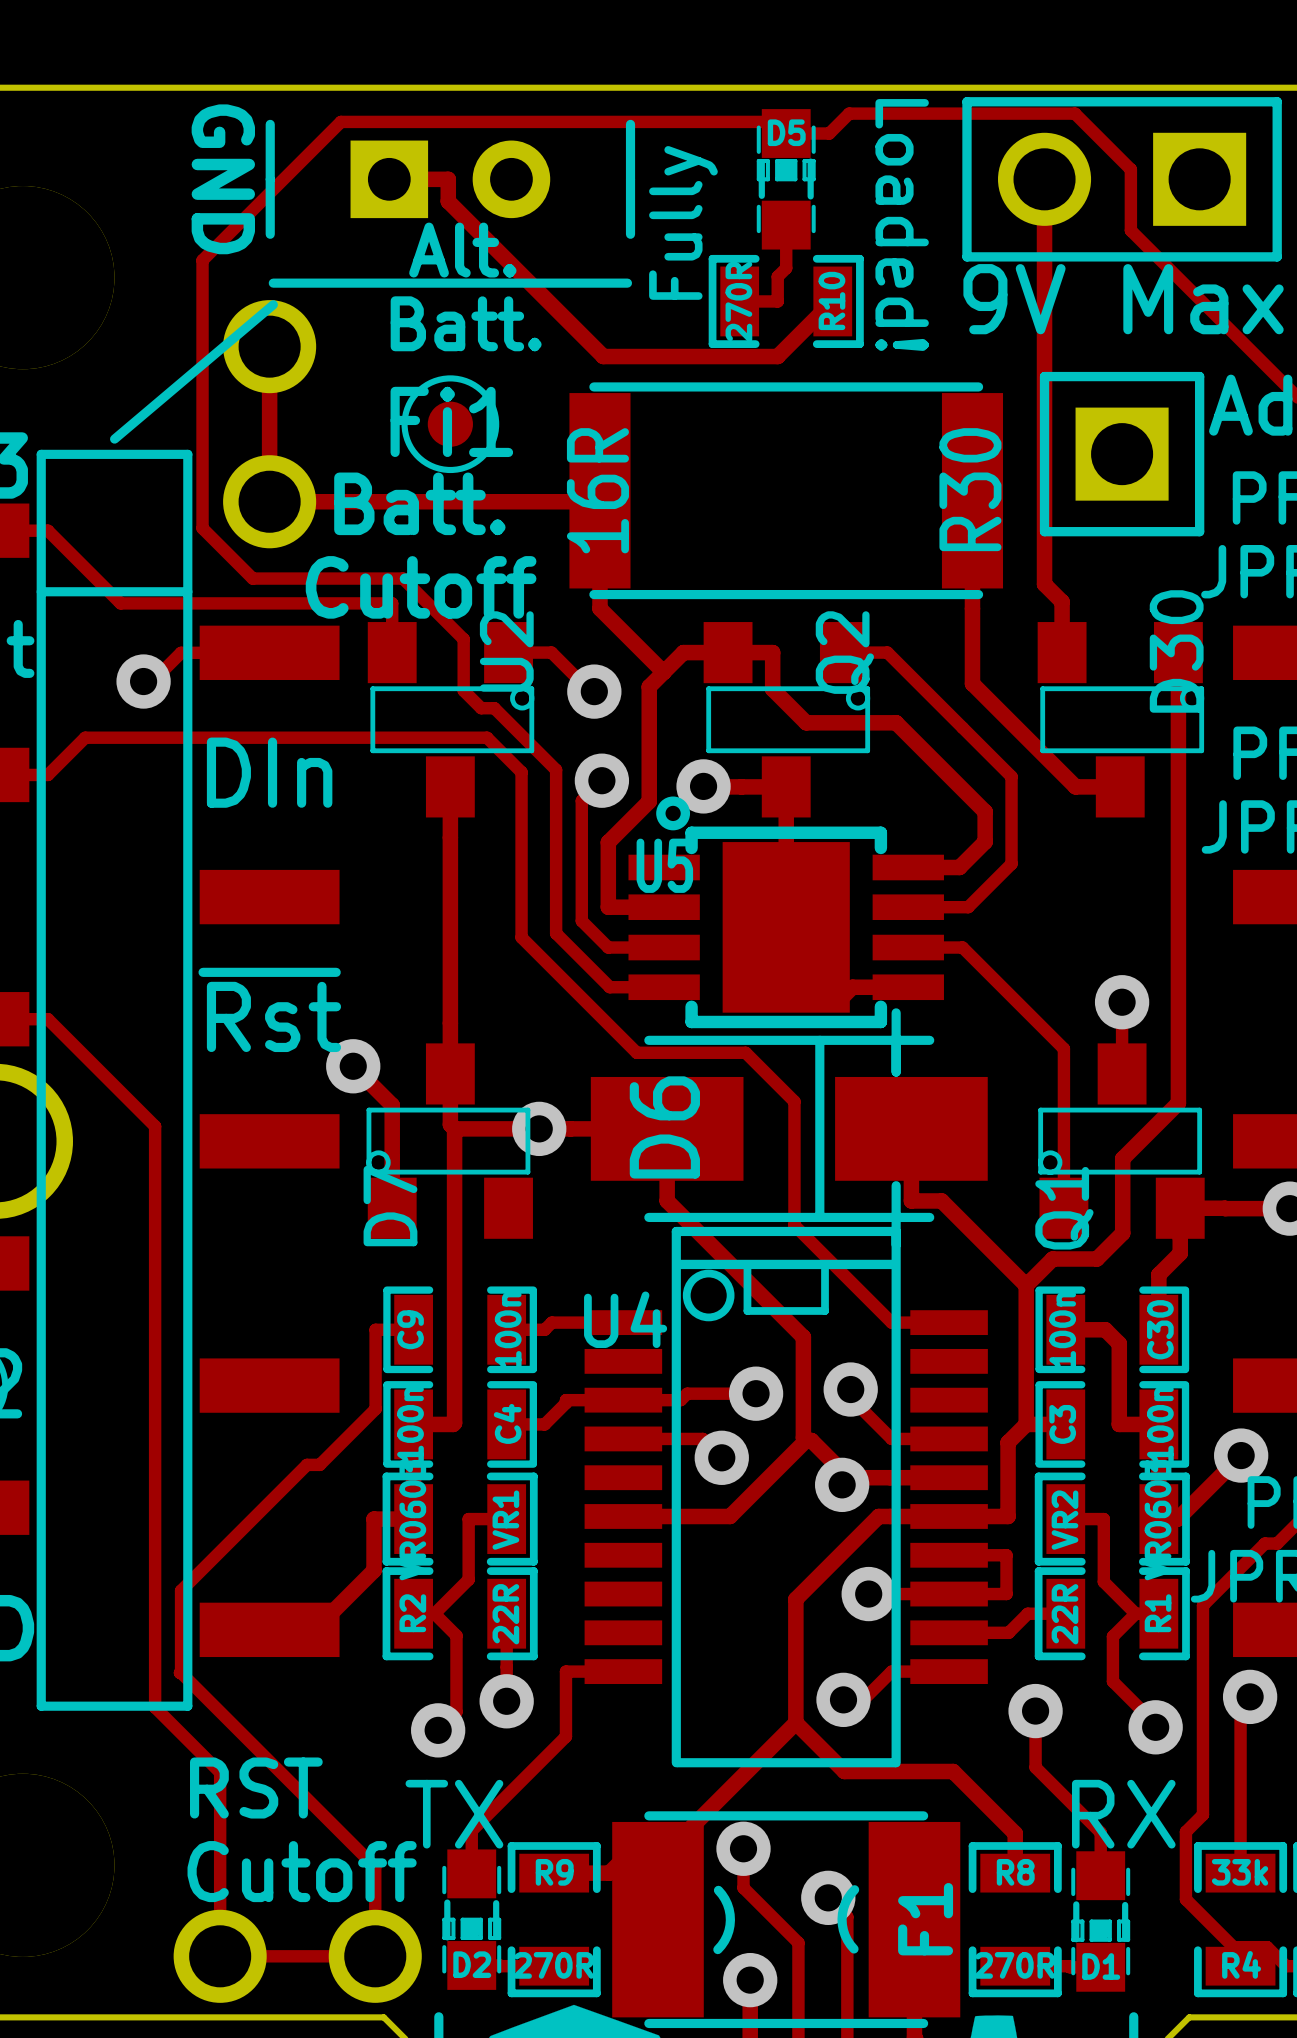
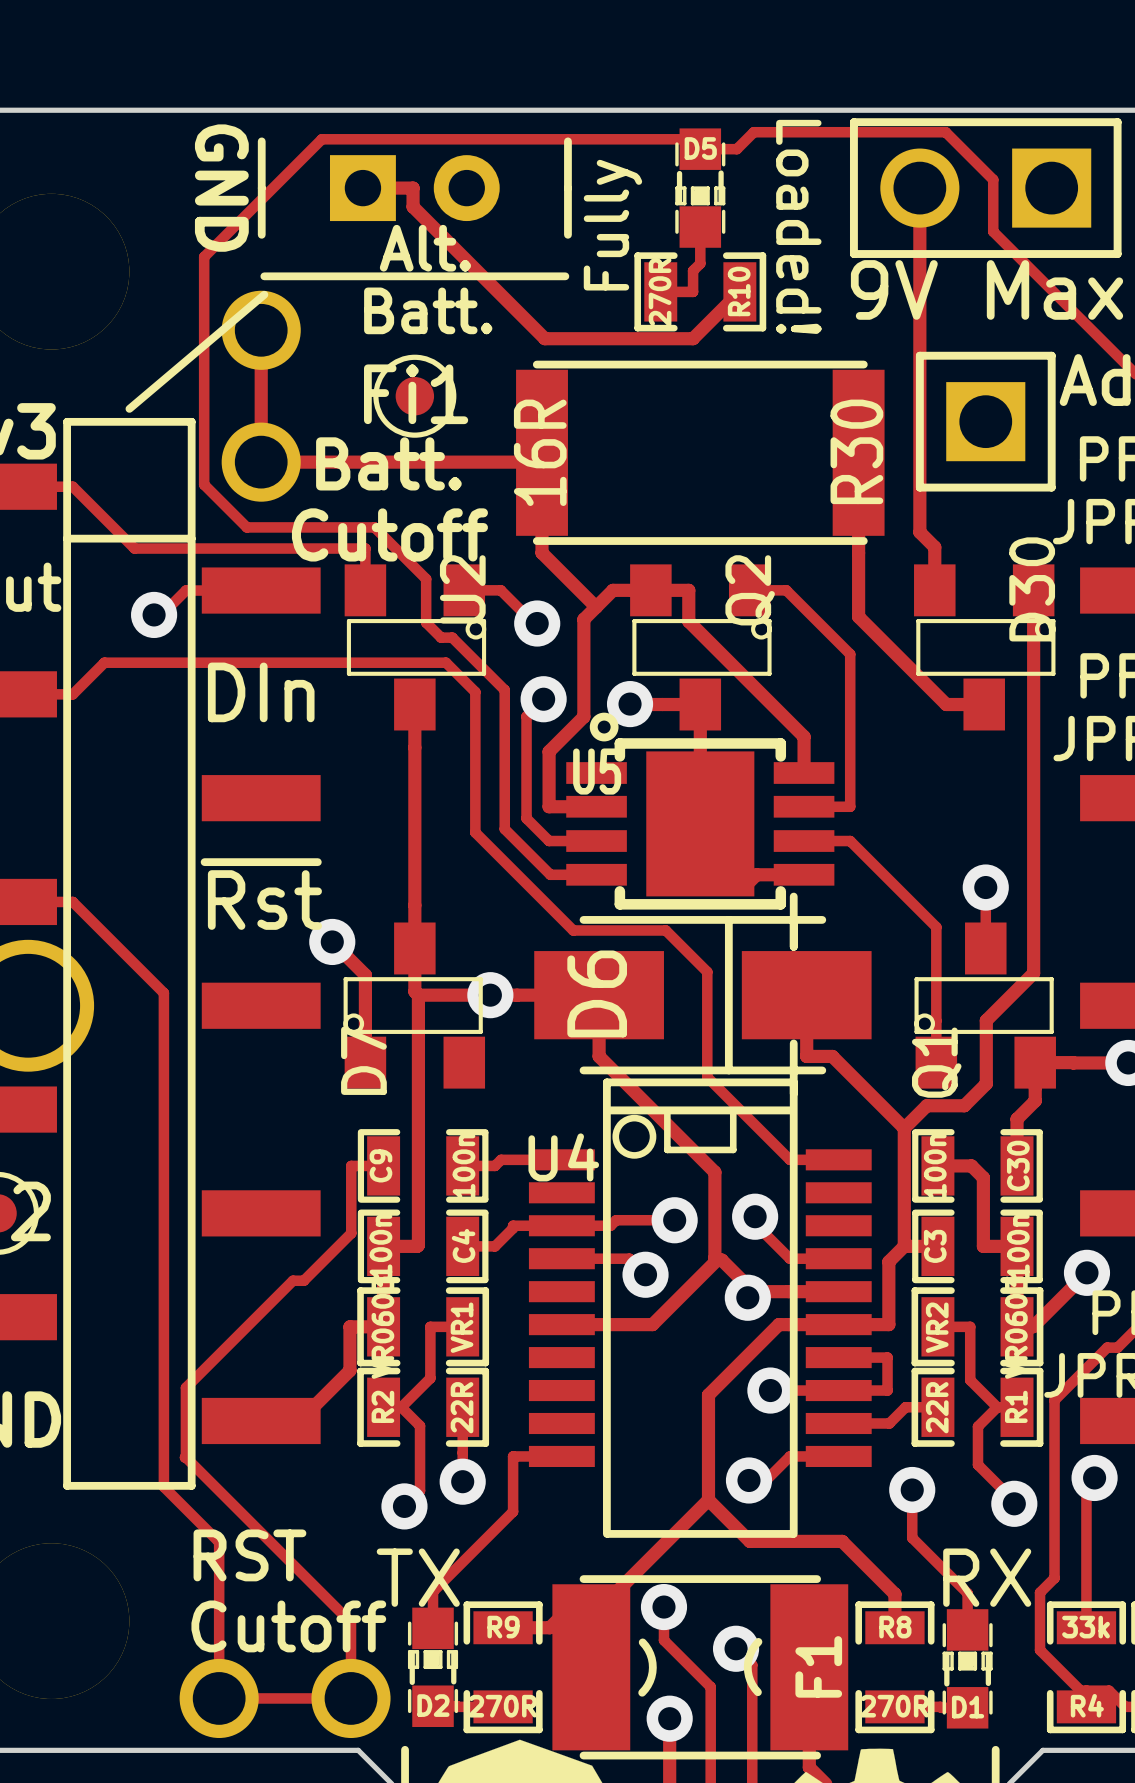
D5 footprint: [756, 109, 816, 250] -> [675, 128, 726, 248]
track: (806, 722) (896, 722) (985, 811) (985, 841) (959, 867) (908, 867) -> (717, 650) (804, 736) (804, 773)
track: (962, 727) (1011, 776) (1011, 863) (968, 907) (962, 907) -> (850, 654) (850, 806)
D2 footprint: [442, 1849, 502, 1990] -> [407, 1607, 459, 1727]
D1 footprint: [1071, 1851, 1131, 1992] -> [942, 1609, 993, 1729]

